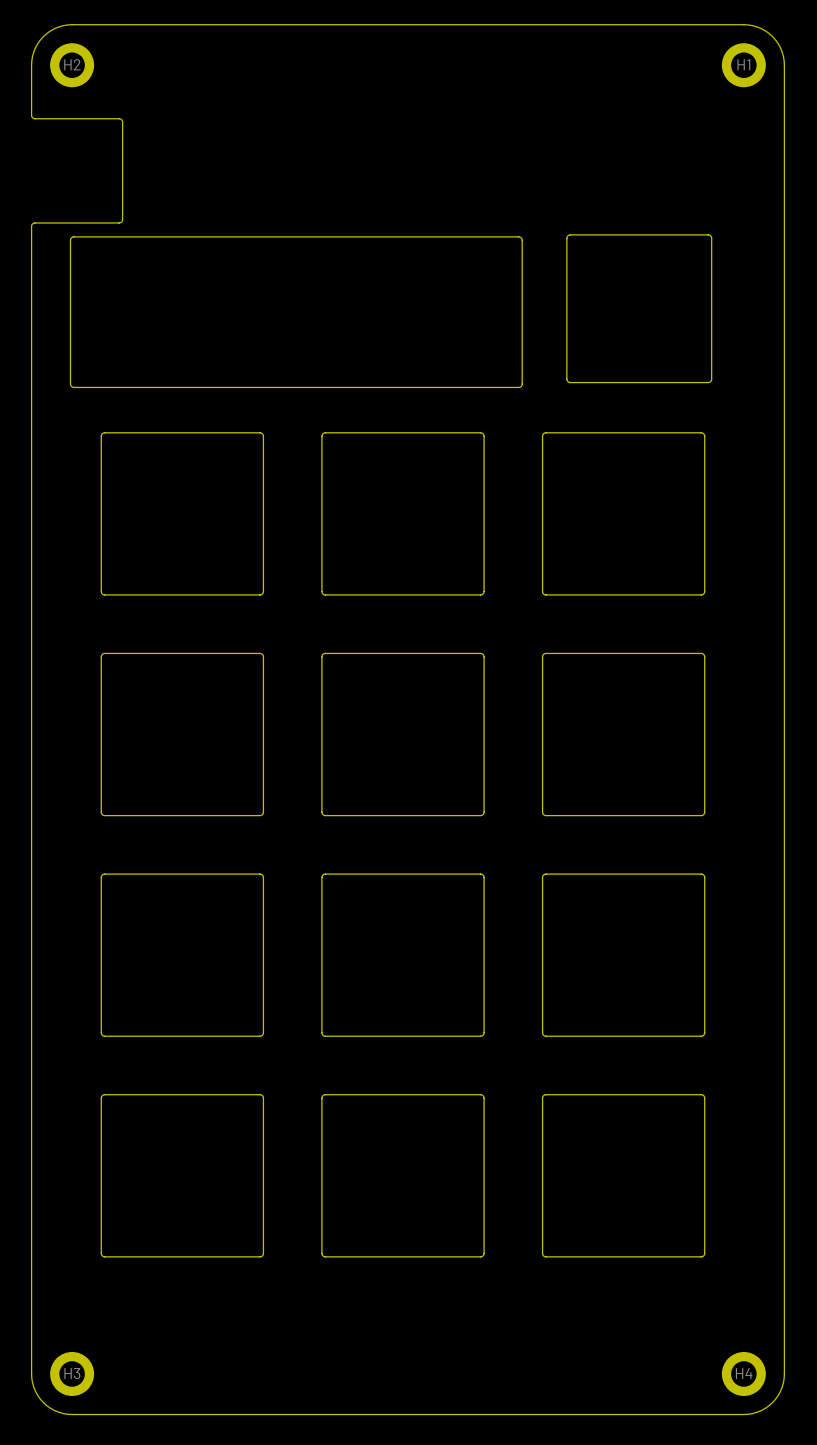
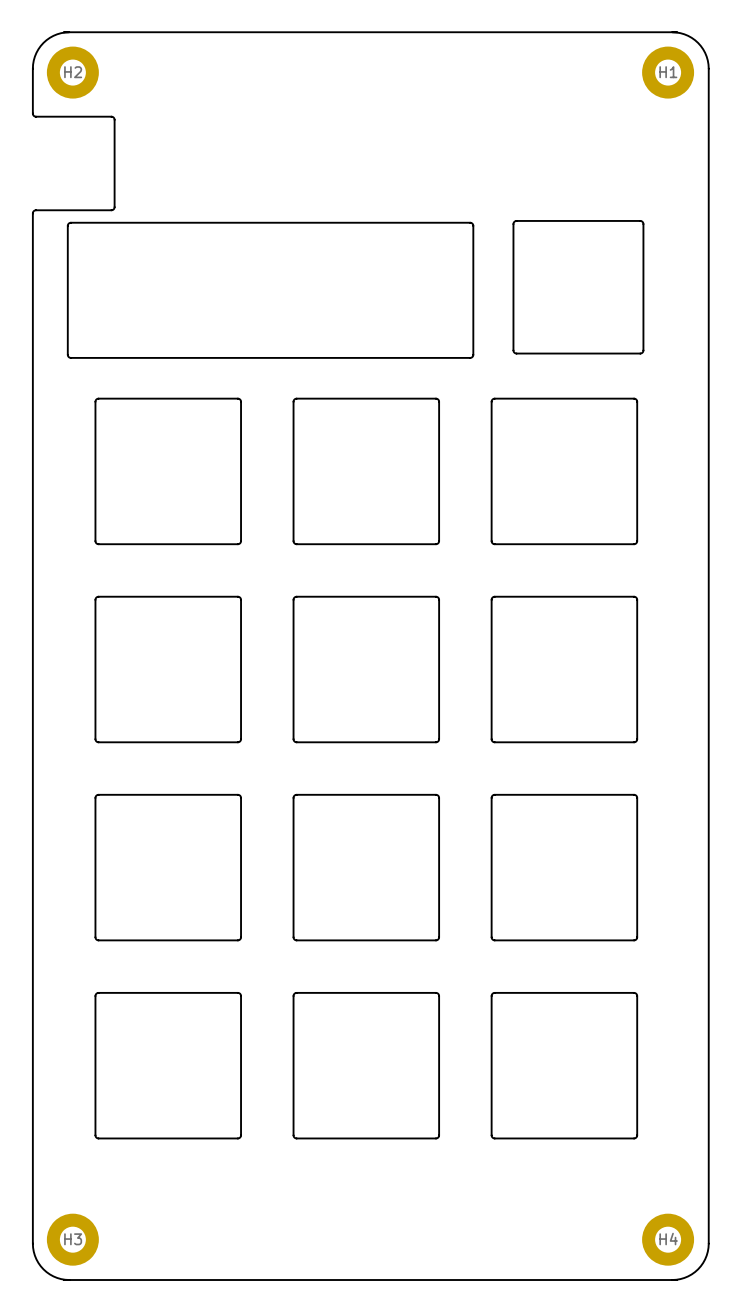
H2 footprint: [50, 43, 95, 88] -> [46, 46, 99, 99]
H1 footprint: [721, 43, 766, 88] -> [642, 46, 695, 99]
H3 footprint: [50, 1351, 95, 1396] -> [46, 1213, 99, 1266]
H4 footprint: [721, 1351, 766, 1396] -> [642, 1213, 695, 1266]

